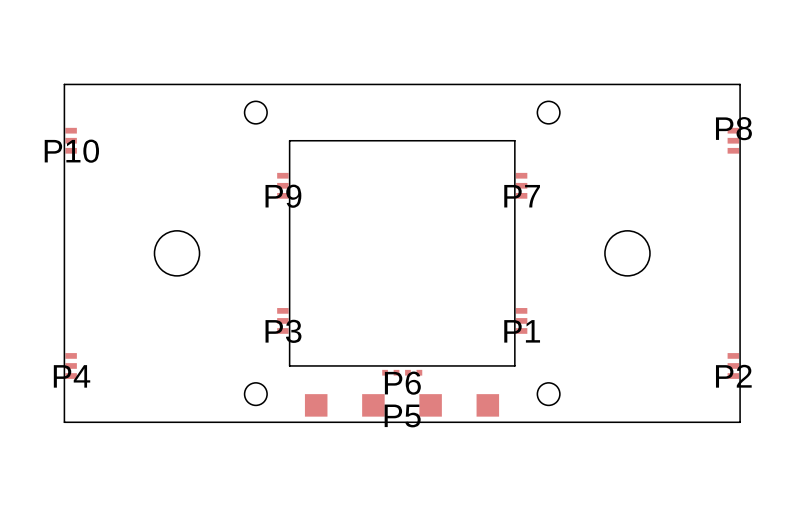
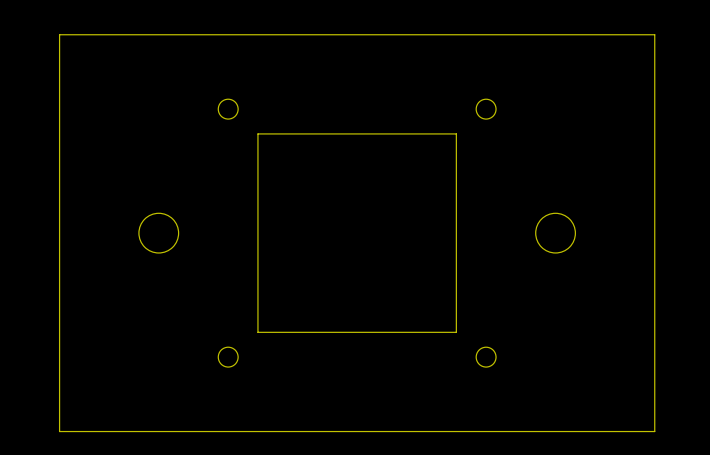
board edge: (64, 84) (740, 84) -> (59, 84) (59, 34) (654, 34) (654, 84)
P10: (71, 140) -> none
P8: (733, 140) -> none
P9: (282, 185) -> none
P7: (521, 185) -> none
P3: (282, 320) -> none
P1: (521, 320) -> none
P4: (71, 365) -> none
P2: (733, 365) -> none
P6: (402, 372) -> none
P5: (402, 405) -> none
board edge: (64, 422) (740, 422) -> (59, 381) (59, 431) (654, 431) (654, 381)

